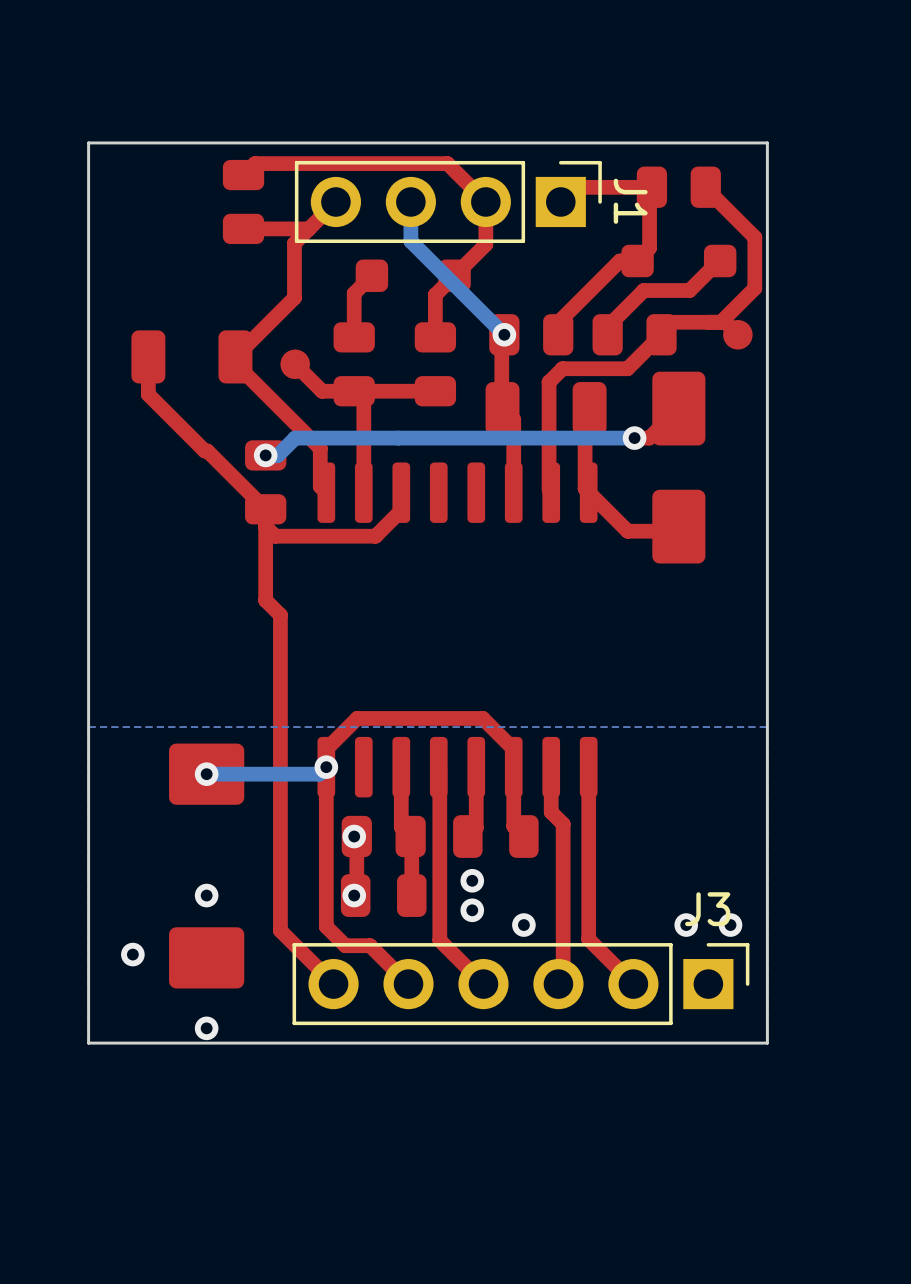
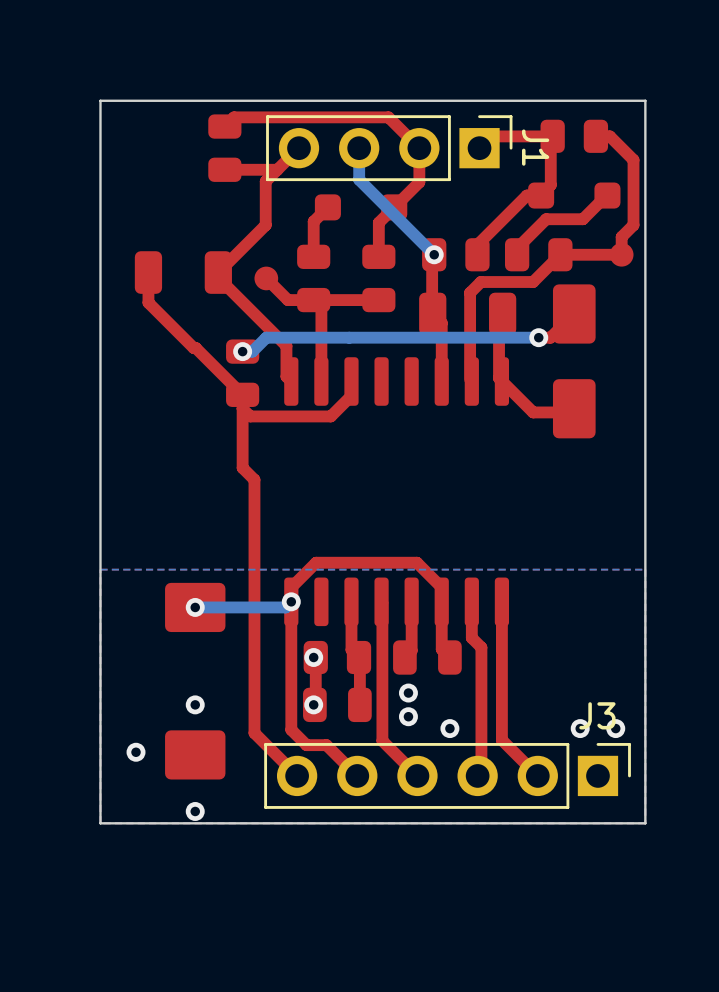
top track: (704, 187) (754, 237) (754, 288) (720, 322) -> (595, 136) (609, 136) (633, 160) (633, 225) (621, 236) (621, 254) (560, 254)
top track: (665, 322) (725, 322) (737, 334) -> none

